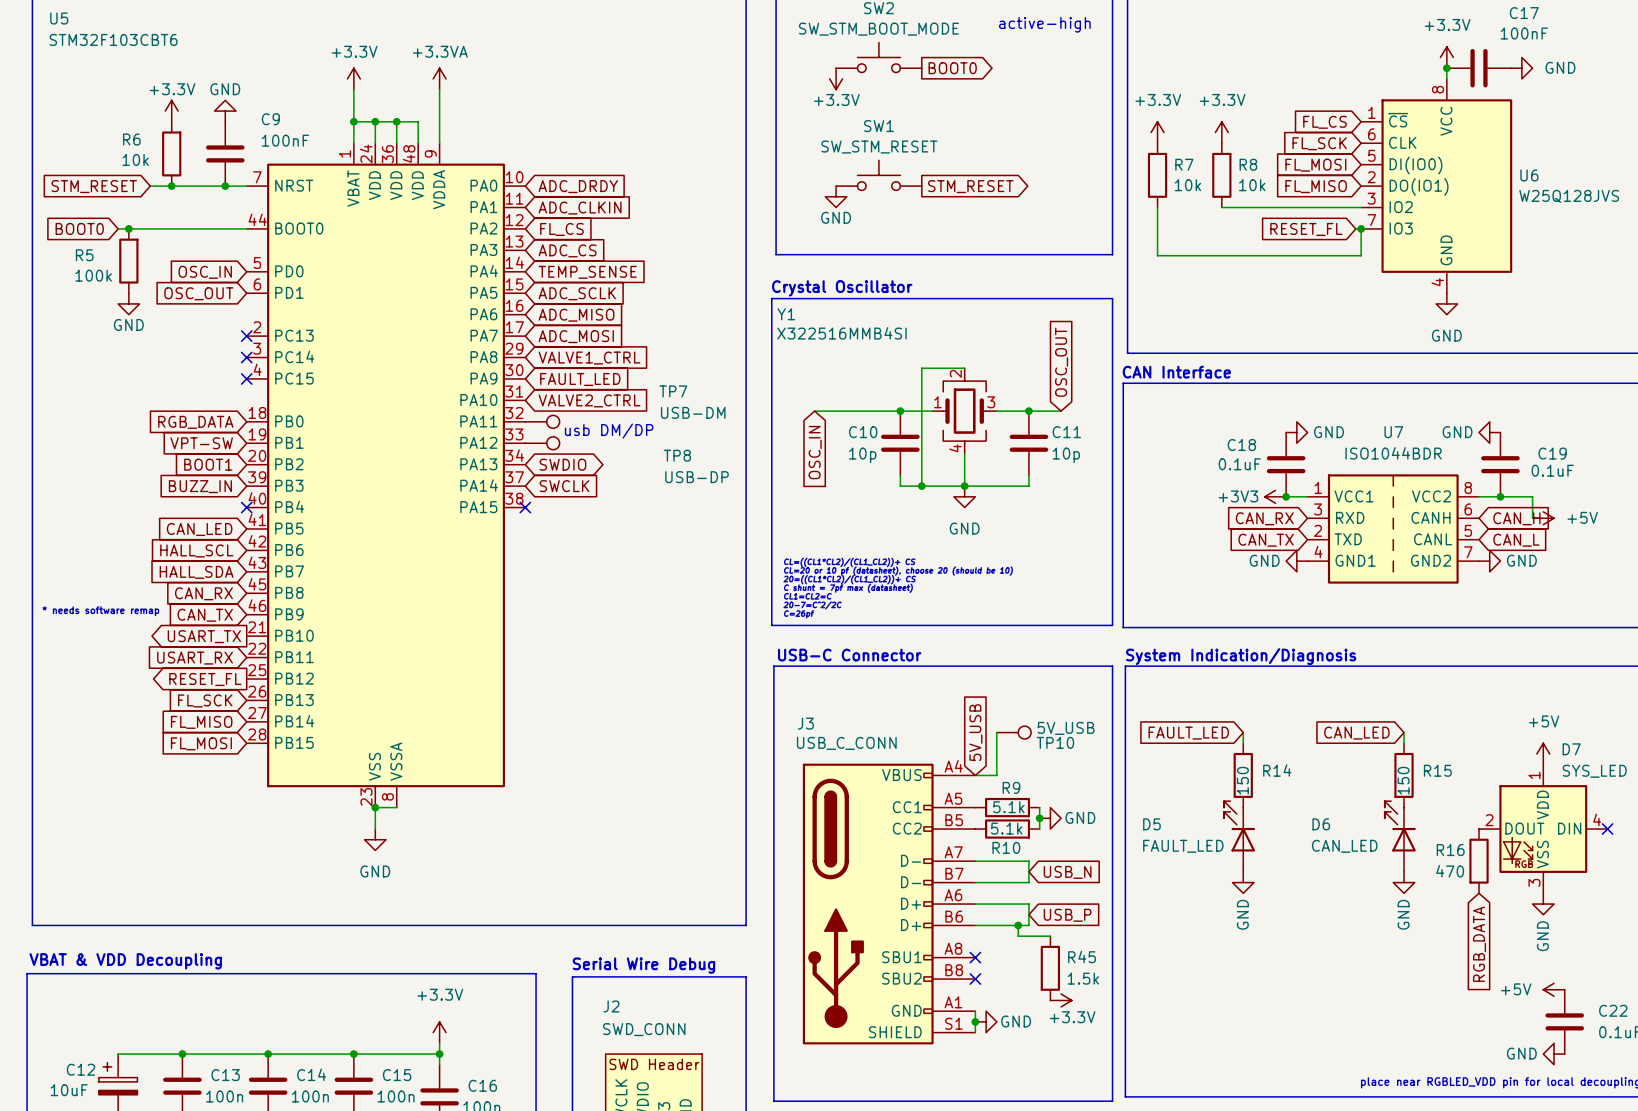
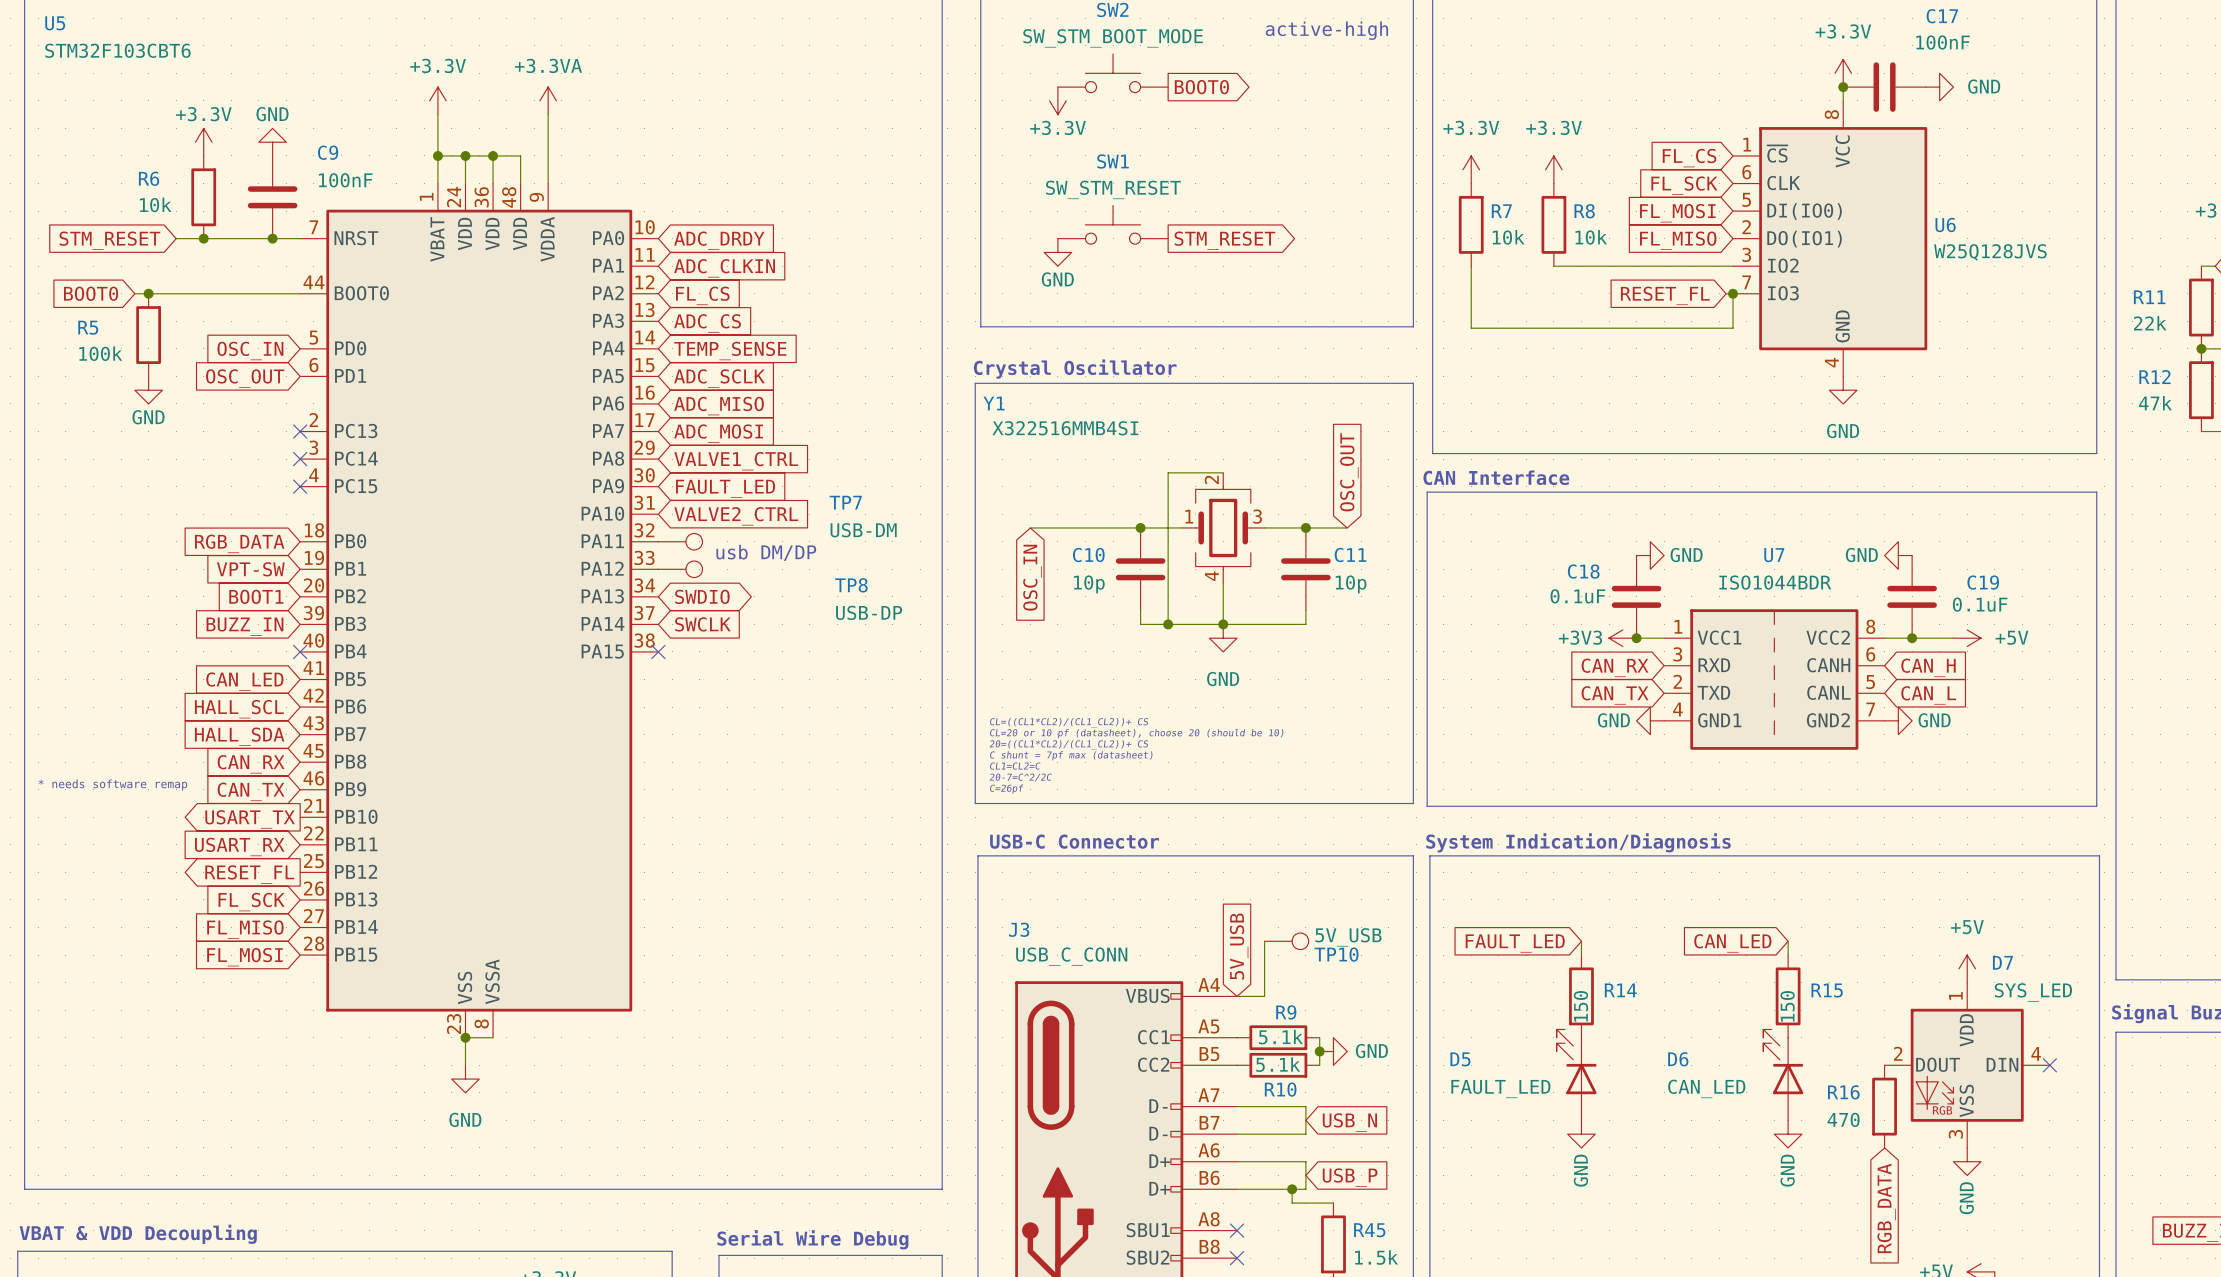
wire: (1532, 496) (1532, 518) -> none
power symbol position: +5V (1543, 518) -> +5V (1967, 638)

